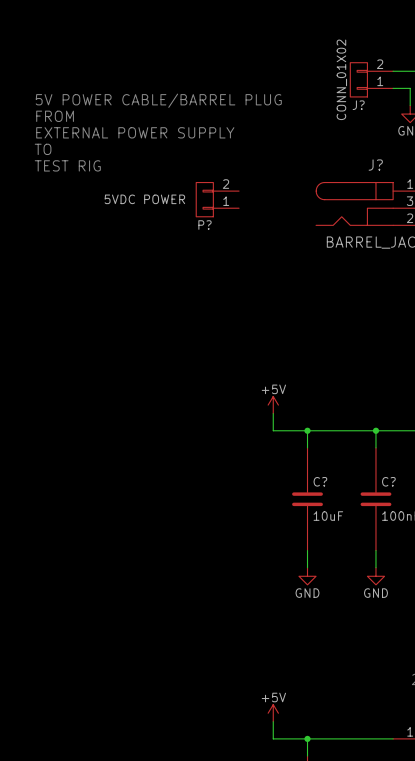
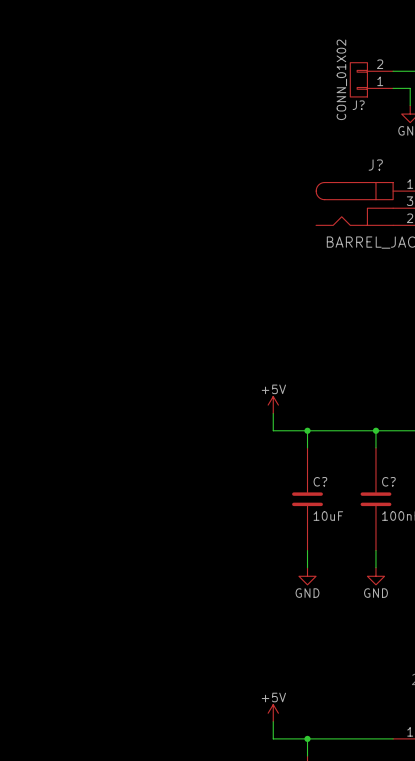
text: 5V POWER CABLE/BARREL PLUG (158, 100) -> none
text: FROM (55, 116) -> none
text: EXTERNAL POWER SUPPLY (135, 132) -> none
text: TO (43, 149) -> none
text: TEST RIG (67, 165) -> none
P?: 5VDC POWER (217, 199) -> none

